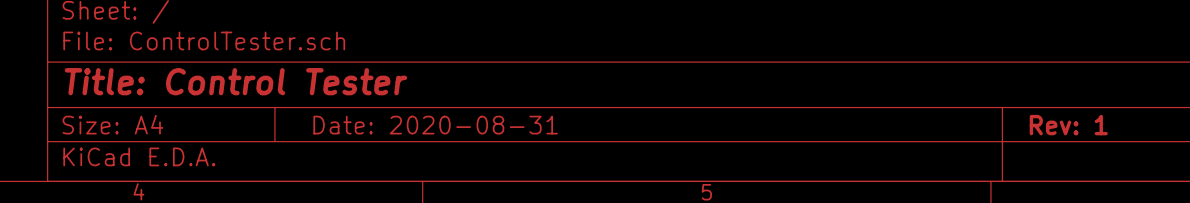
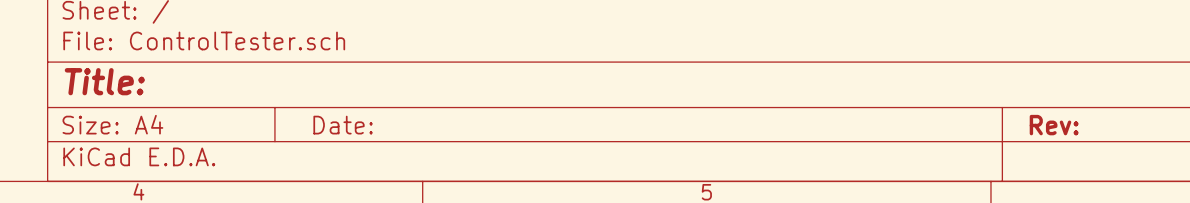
title block: Title: Control Tester (235, 81) -> Title: (104, 81)
title block: Date: 2020-08-31 (435, 125) -> Date: (343, 125)
title block: Rev: 1 (1068, 125) -> Rev: (1054, 125)

